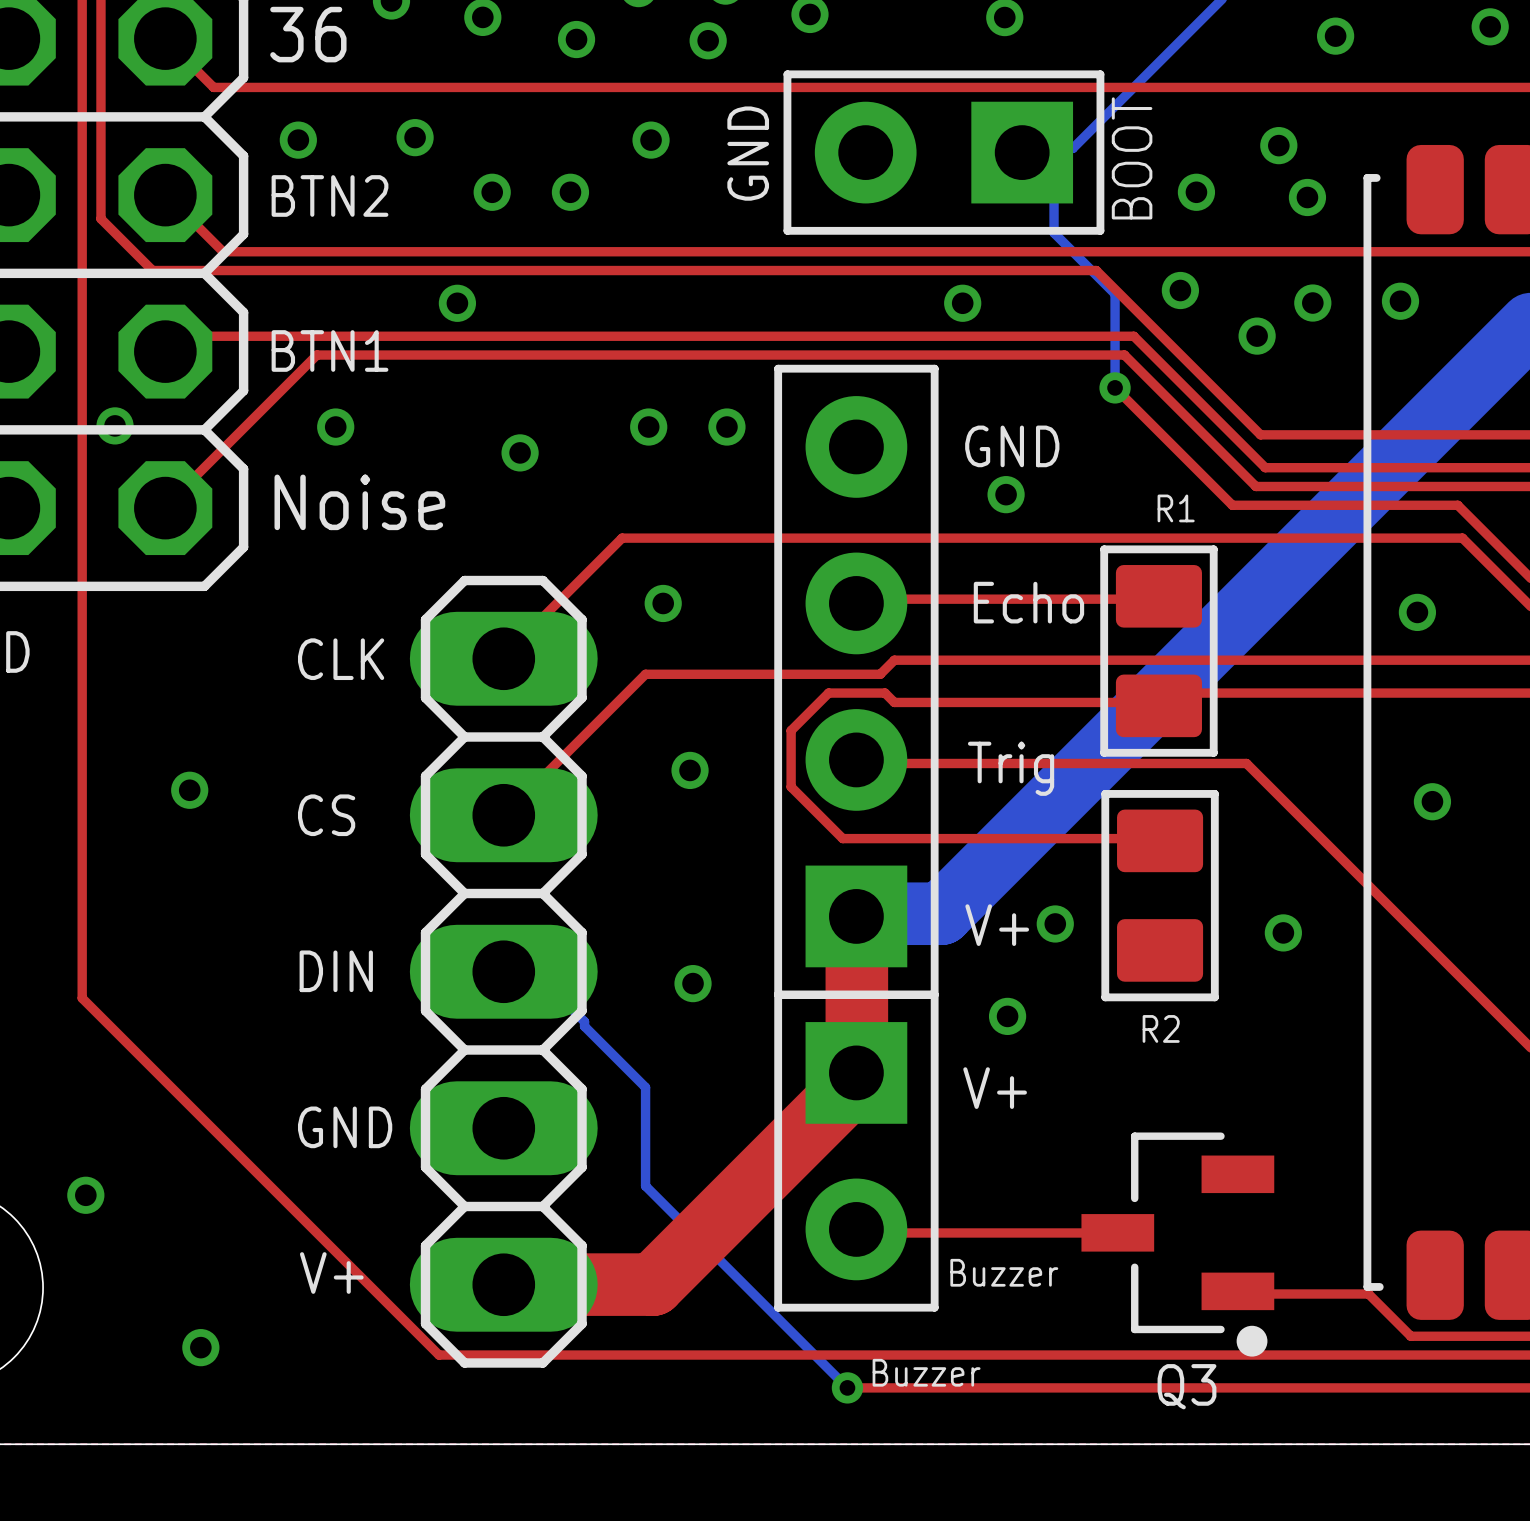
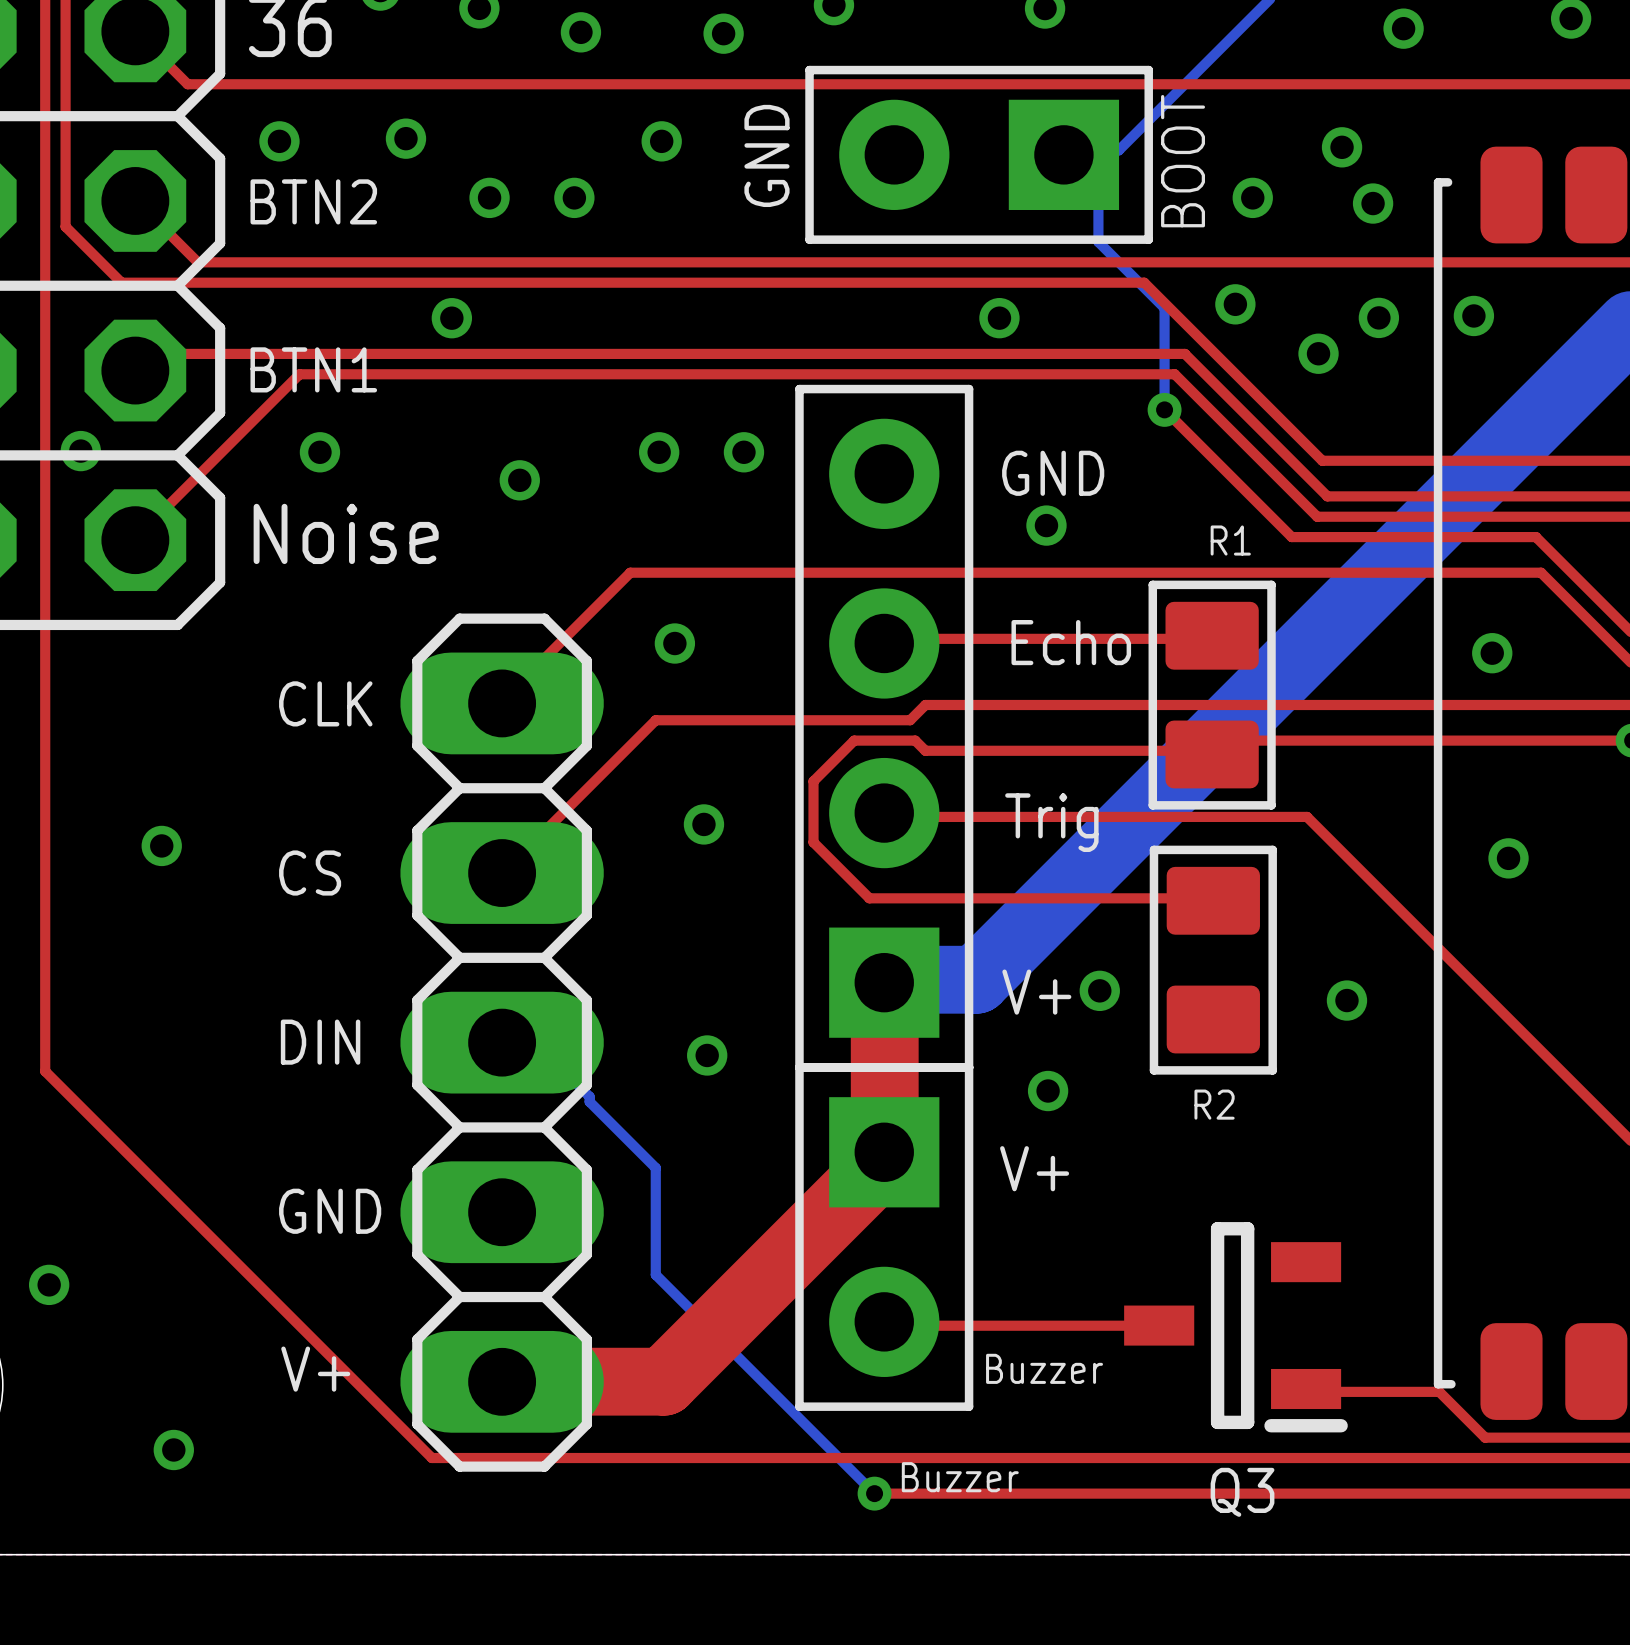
Q3 footprint: [1081, 1132, 1275, 1357] -> [1124, 1222, 1348, 1433]

